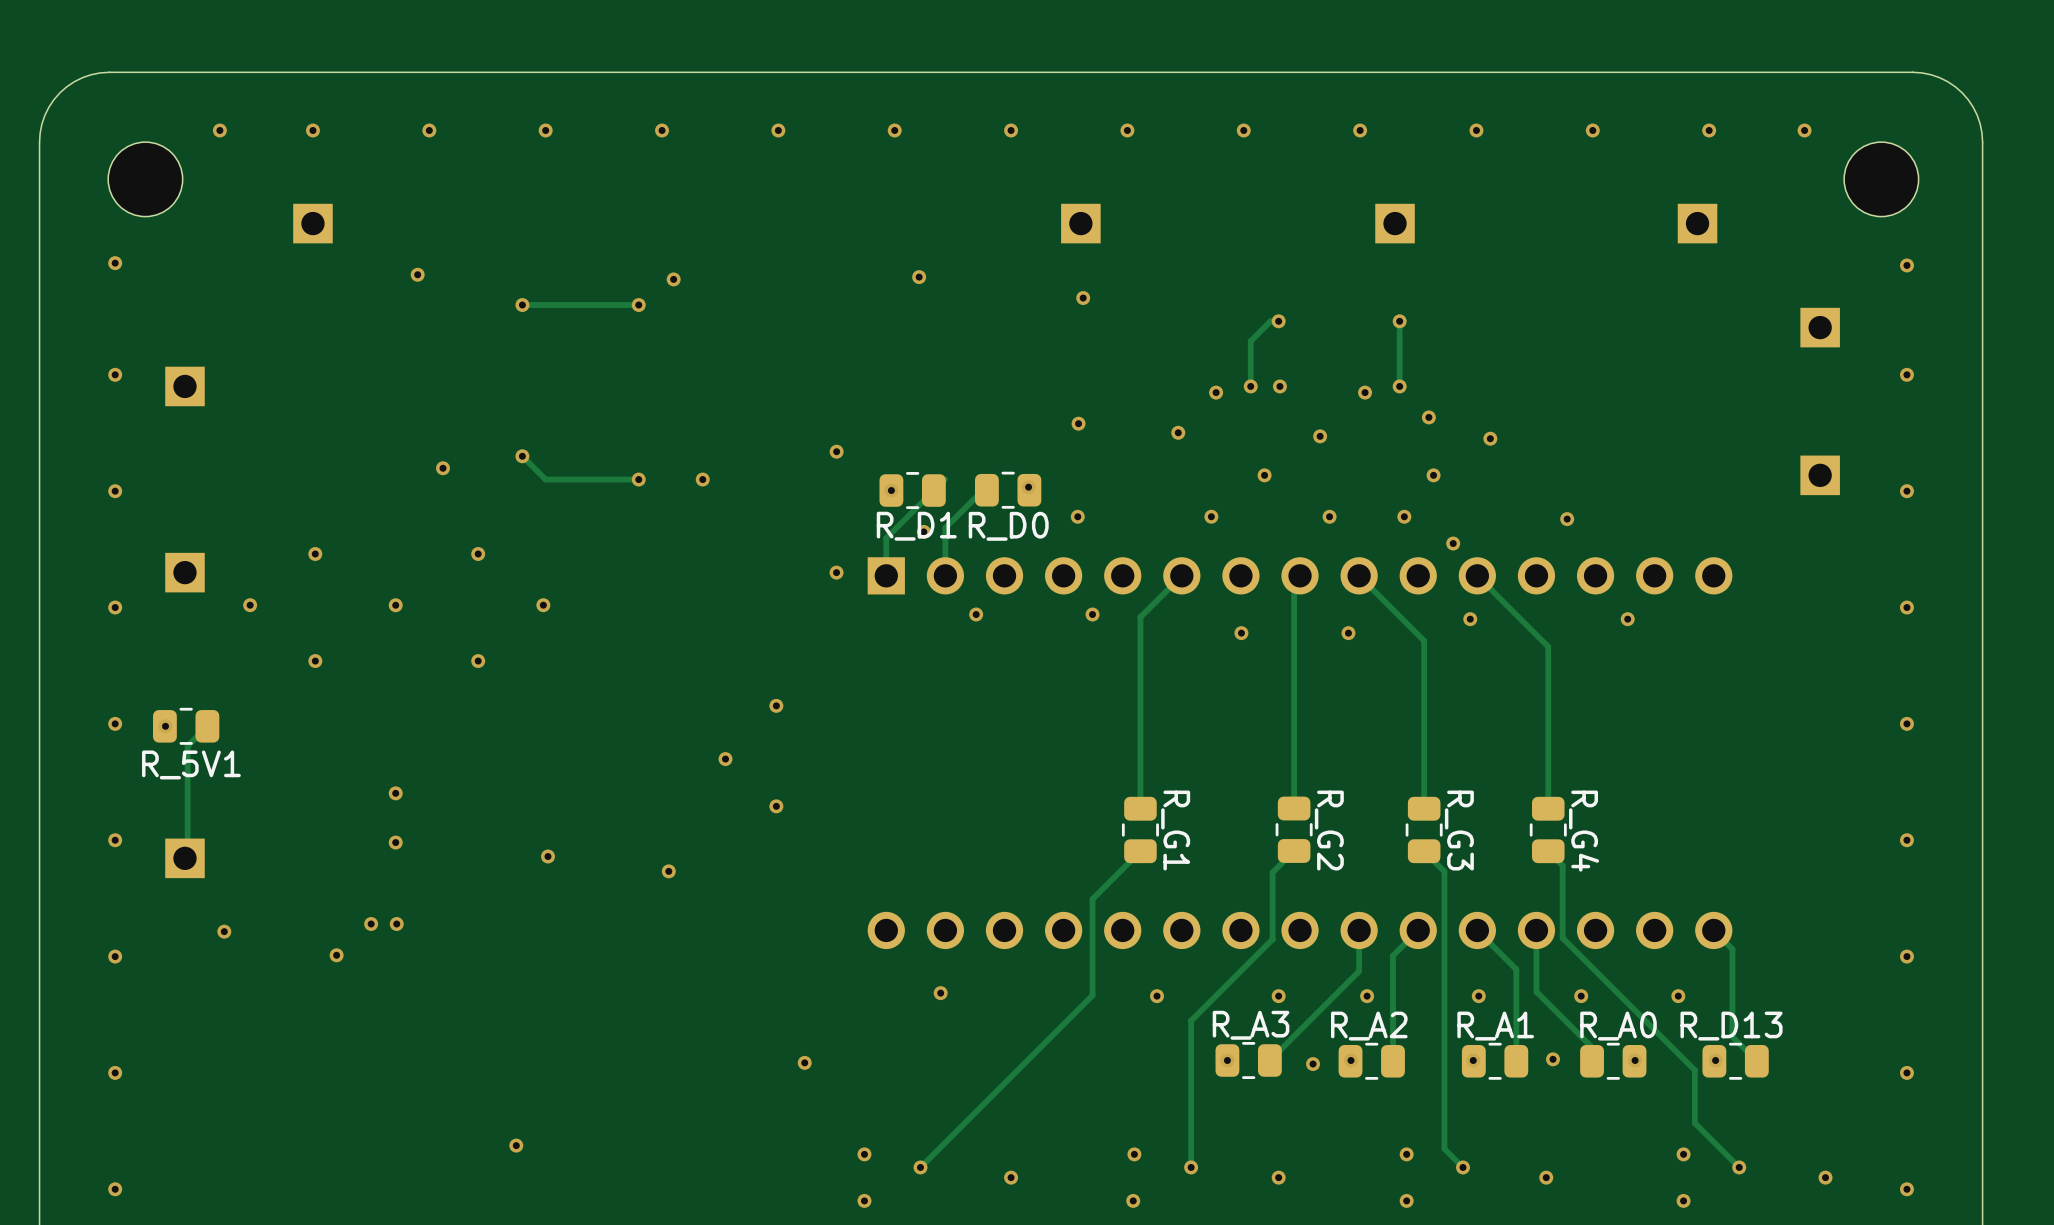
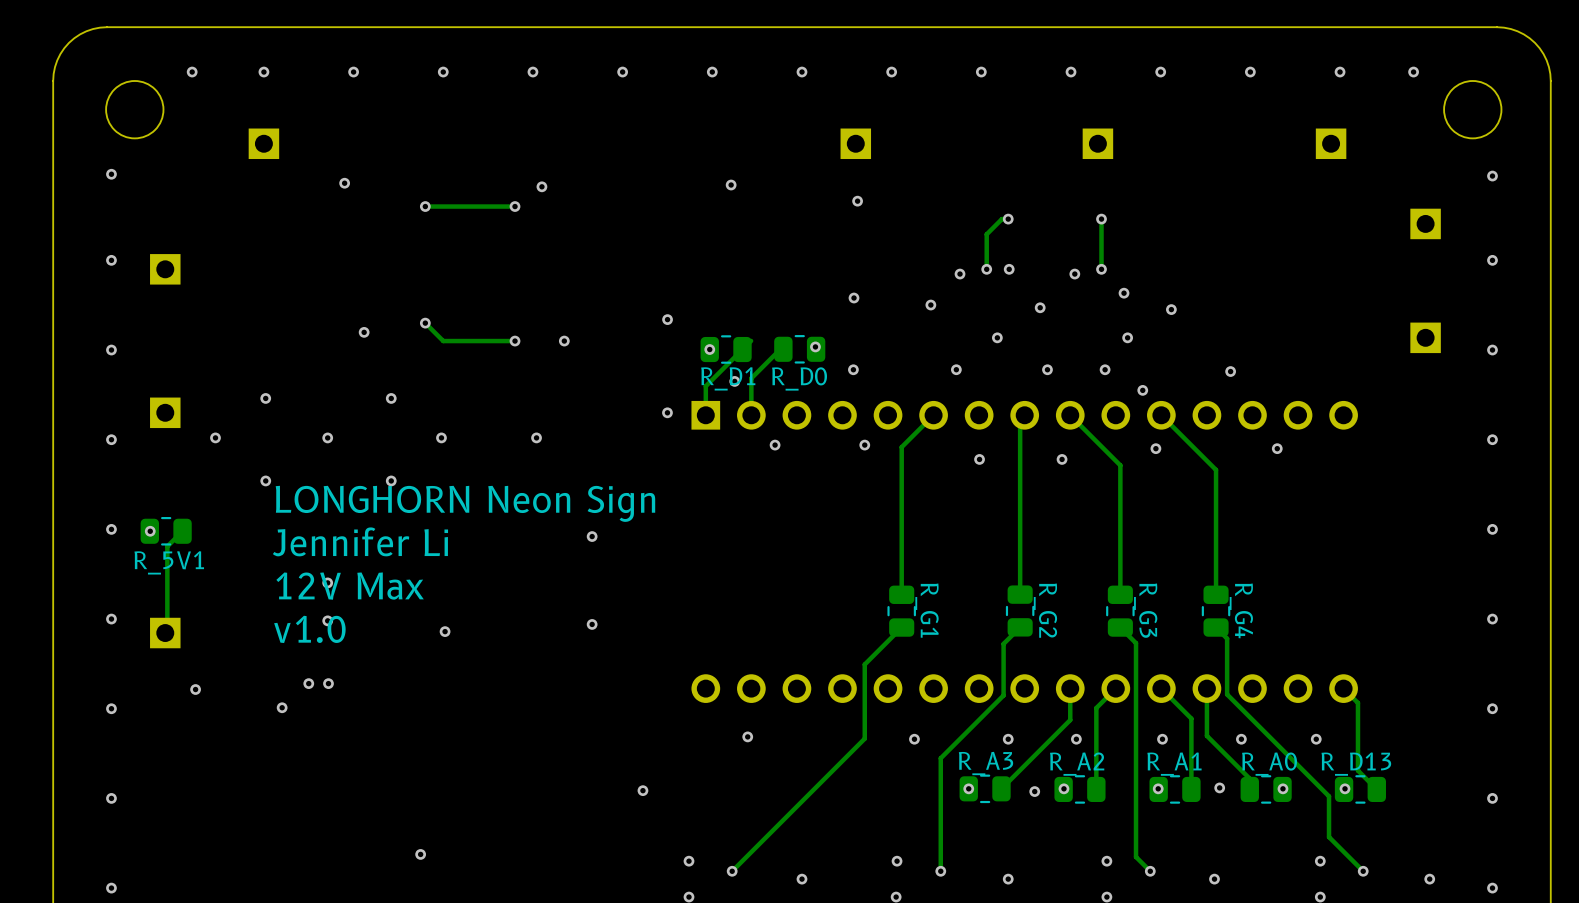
via: none -> (536, 437)
text: none -> LONGHORN Neon Sign (465, 503)
via: (776, 705) -> none
via: none -> (592, 536)
text: none -> Jennifer Li (360, 541)
via: (725, 759) -> none
text: none -> 12V Max (350, 586)
via: (776, 806) -> none
via: none -> (592, 624)
text: none -> v1.0 (309, 629)
via: (668, 871) -> none

